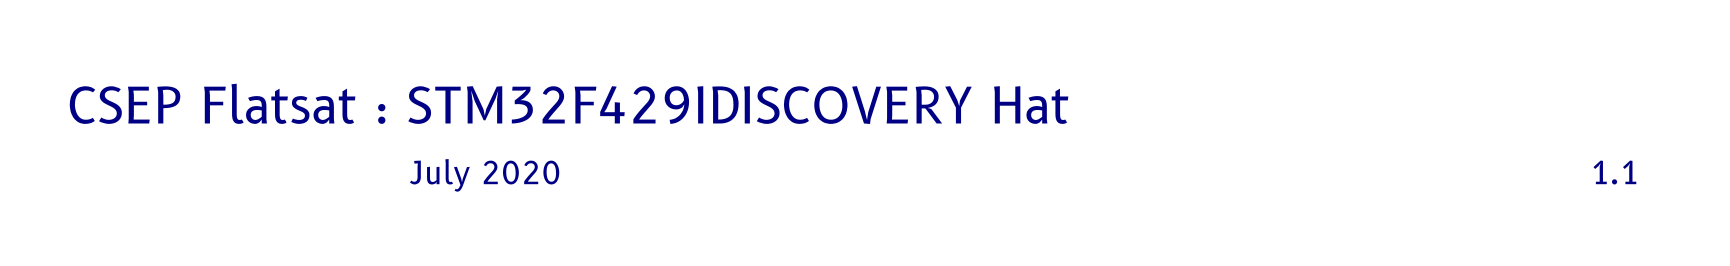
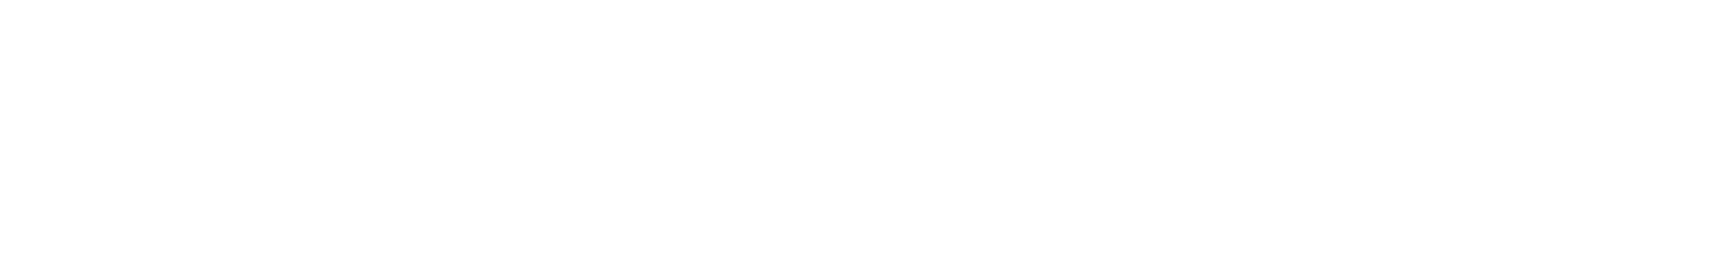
text: CSEP Flatsat : STM32F429IDISCOVERY Hat (569, 103) -> none
text: 1.1 (1614, 172) -> none
text: July 2020 (484, 175) -> none

